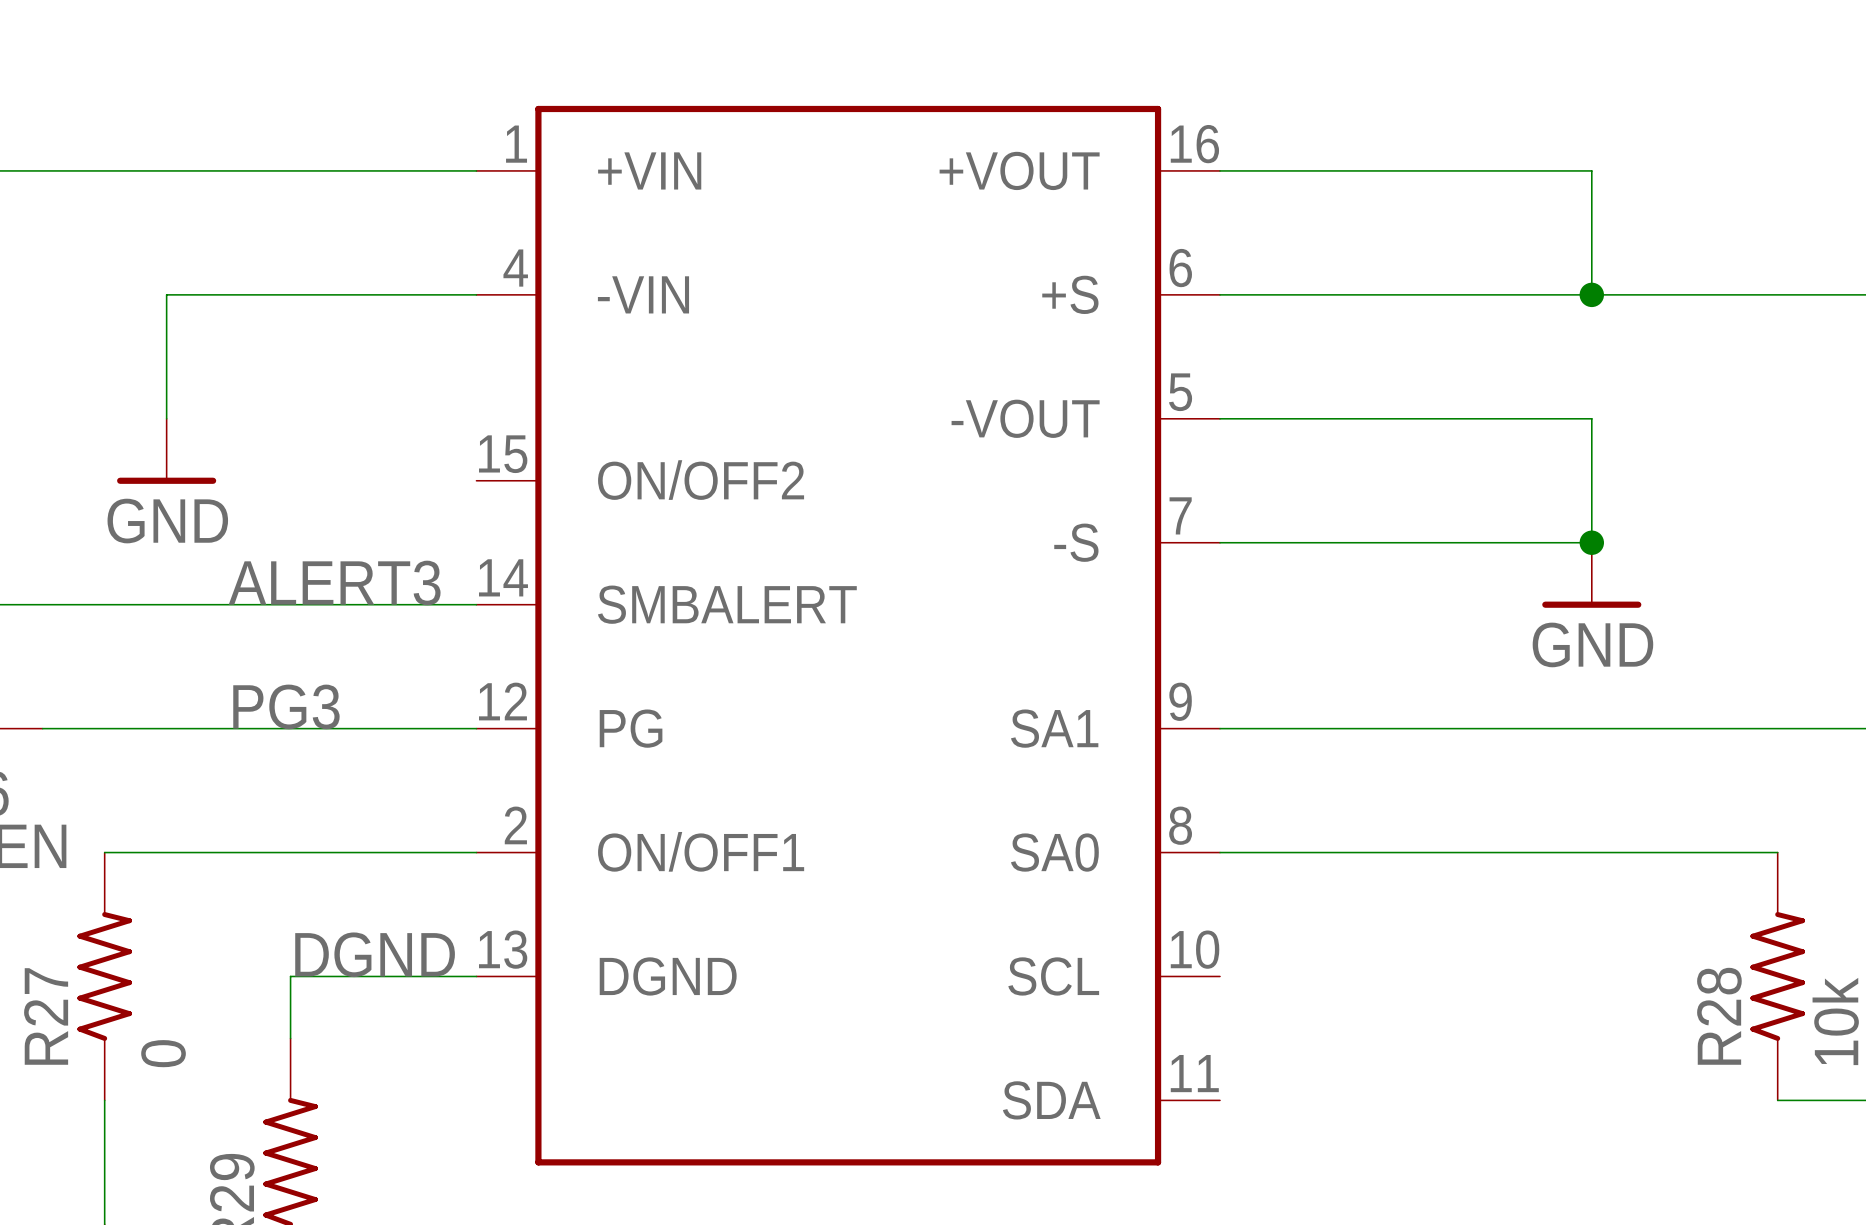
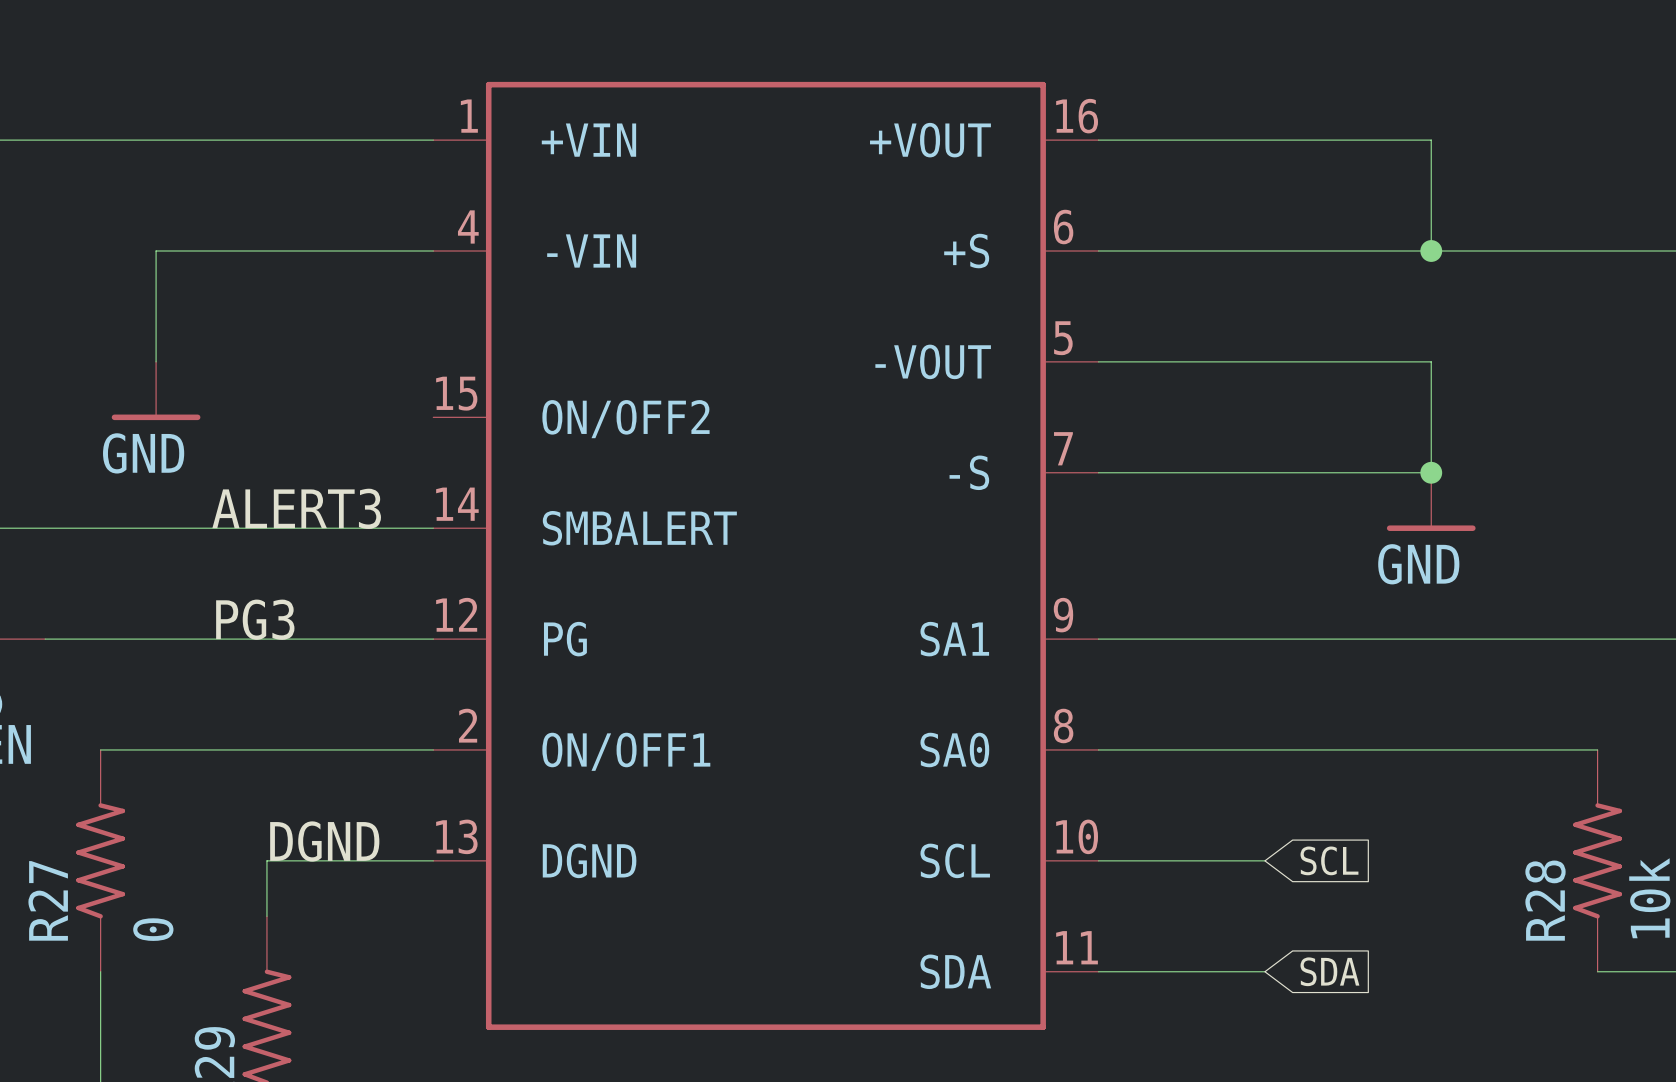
wire: none -> (1098, 860) (1264, 860)
global label: none -> SCL (1329, 860)
wire: none -> (1098, 971) (1264, 971)
global label: none -> SDA (1329, 971)

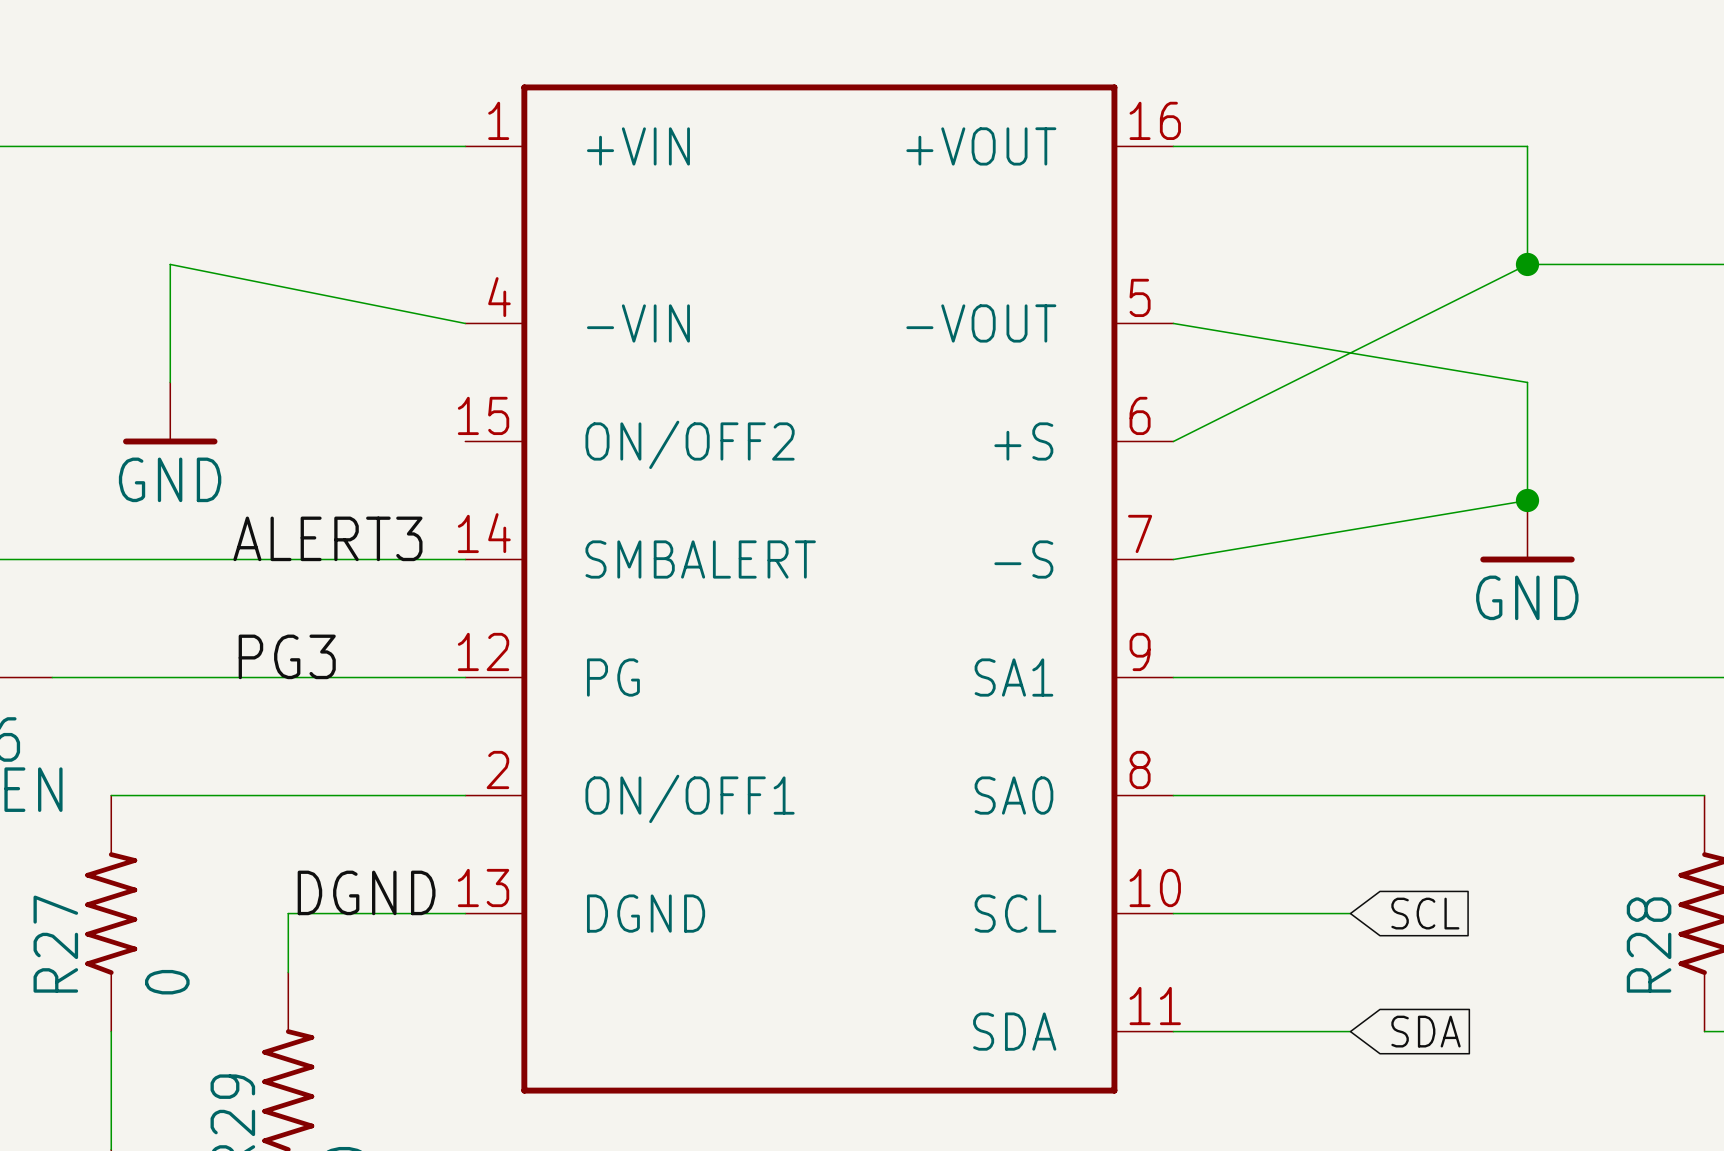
part symbol: [433, 81, 1099, 1030] -> [465, 84, 1174, 1094]
wire: (156, 250) (433, 250) -> (170, 264) (465, 323)
wire: (1098, 250) (1431, 250) -> (1173, 441) (1527, 264)
wire: (1098, 361) (1431, 361) -> (1173, 323) (1527, 382)
wire: (1098, 472) (1431, 472) -> (1173, 559) (1527, 500)

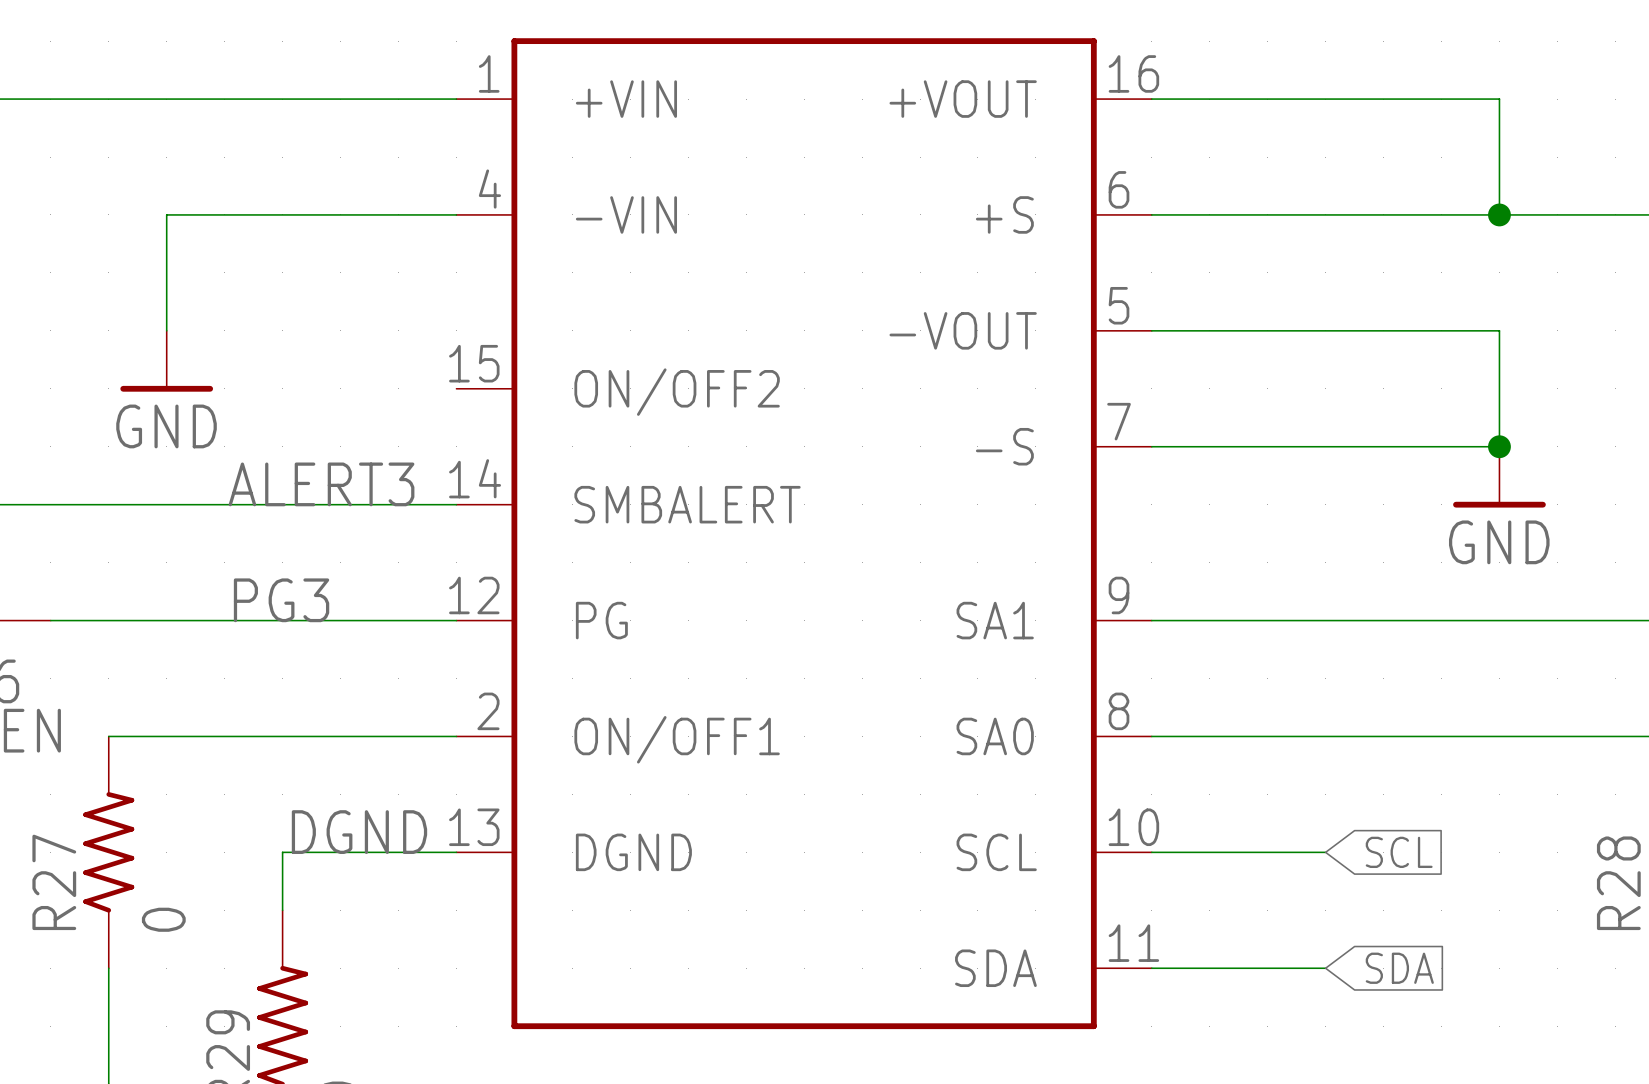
part symbol: [465, 84, 1174, 1094] -> [456, 38, 1152, 1030]
wire: (170, 264) (465, 323) -> (166, 214) (456, 214)
wire: (1527, 264) (1173, 441) -> (1499, 214) (1151, 214)
wire: (1173, 323) (1527, 382) -> (1151, 330) (1499, 330)
wire: (1527, 500) (1173, 559) -> (1499, 446) (1151, 446)

